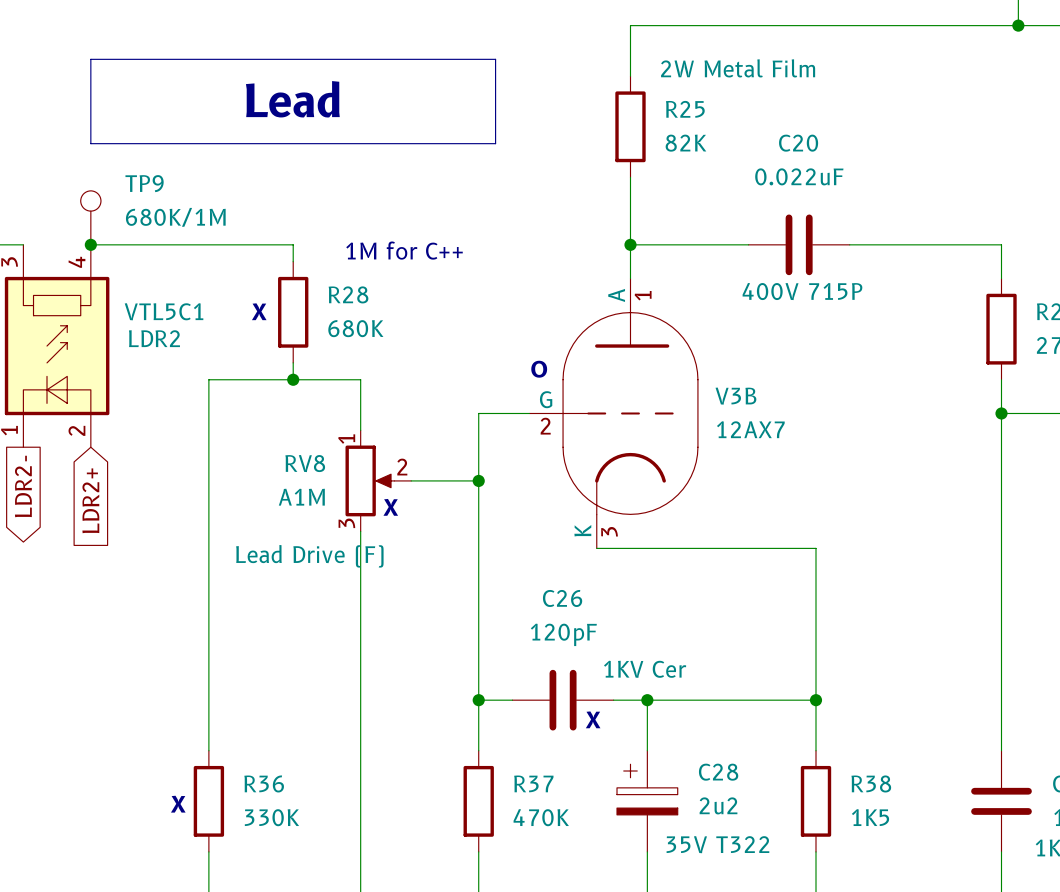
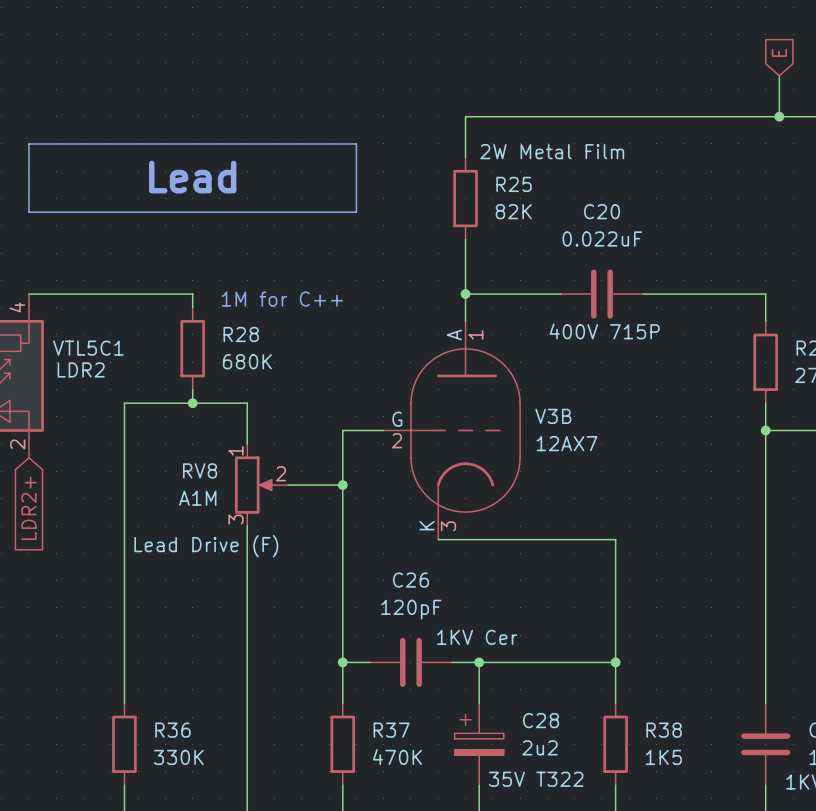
TP9: 680K/1M (90, 217) -> none
junction: (90, 244) -> none
text: X (259, 311) -> none
text: O (539, 369) -> none
text: X (390, 507) -> none
text: X (593, 719) -> none
text: X (178, 804) -> none

